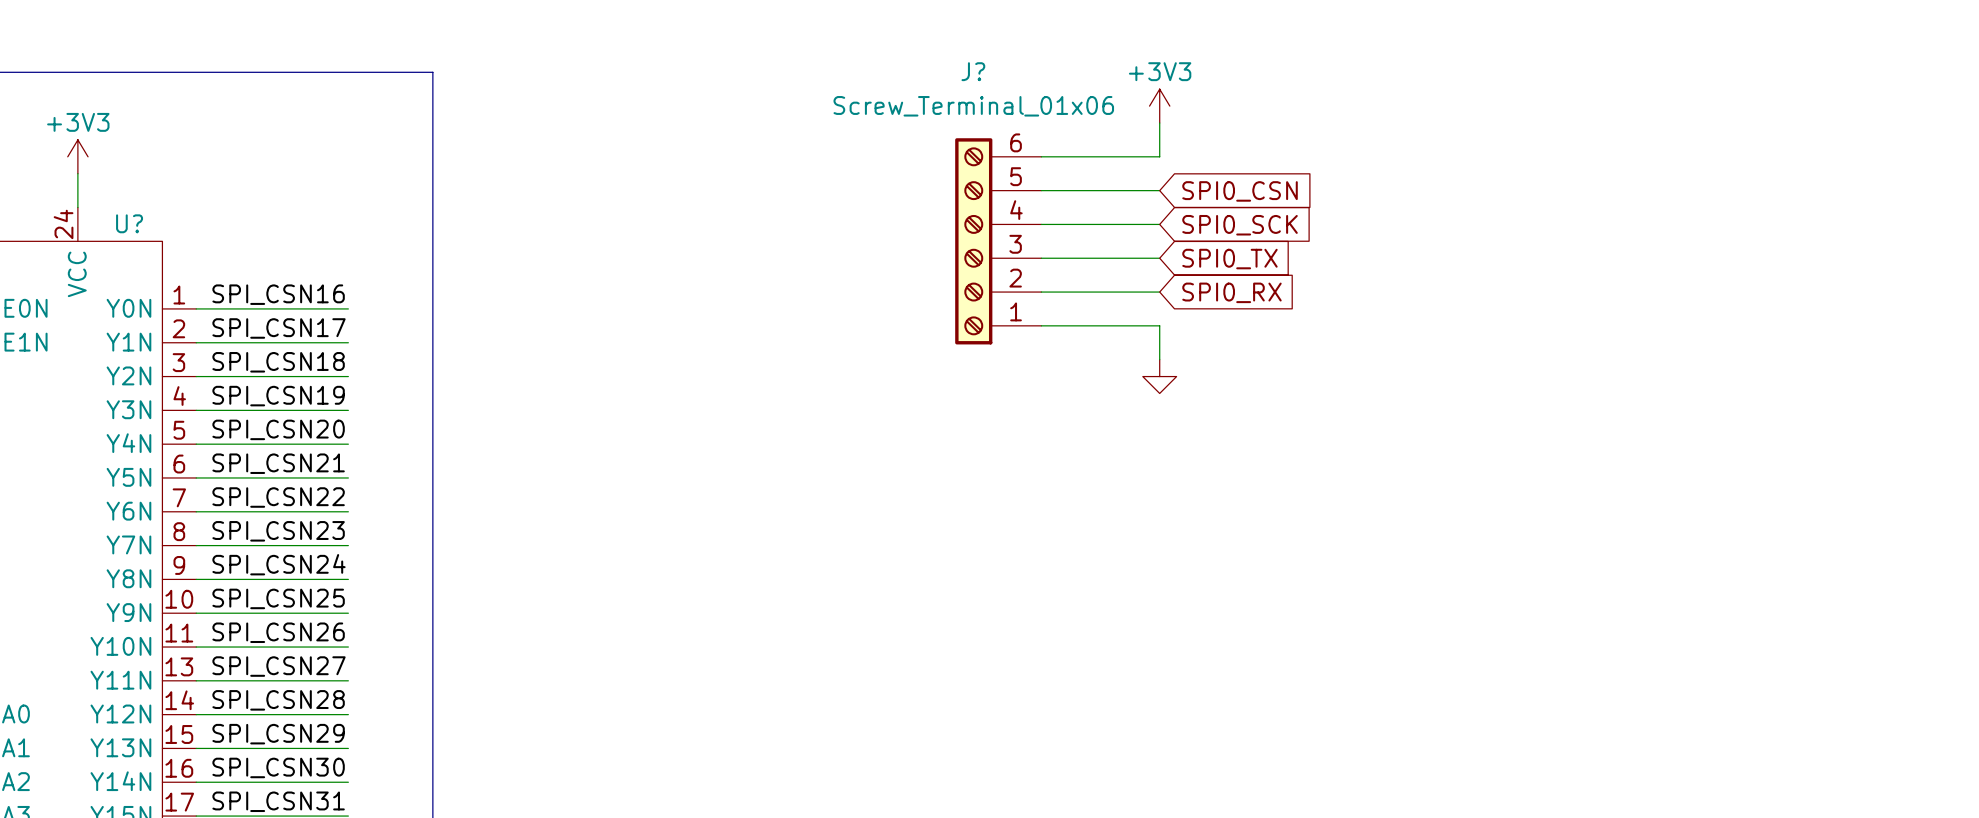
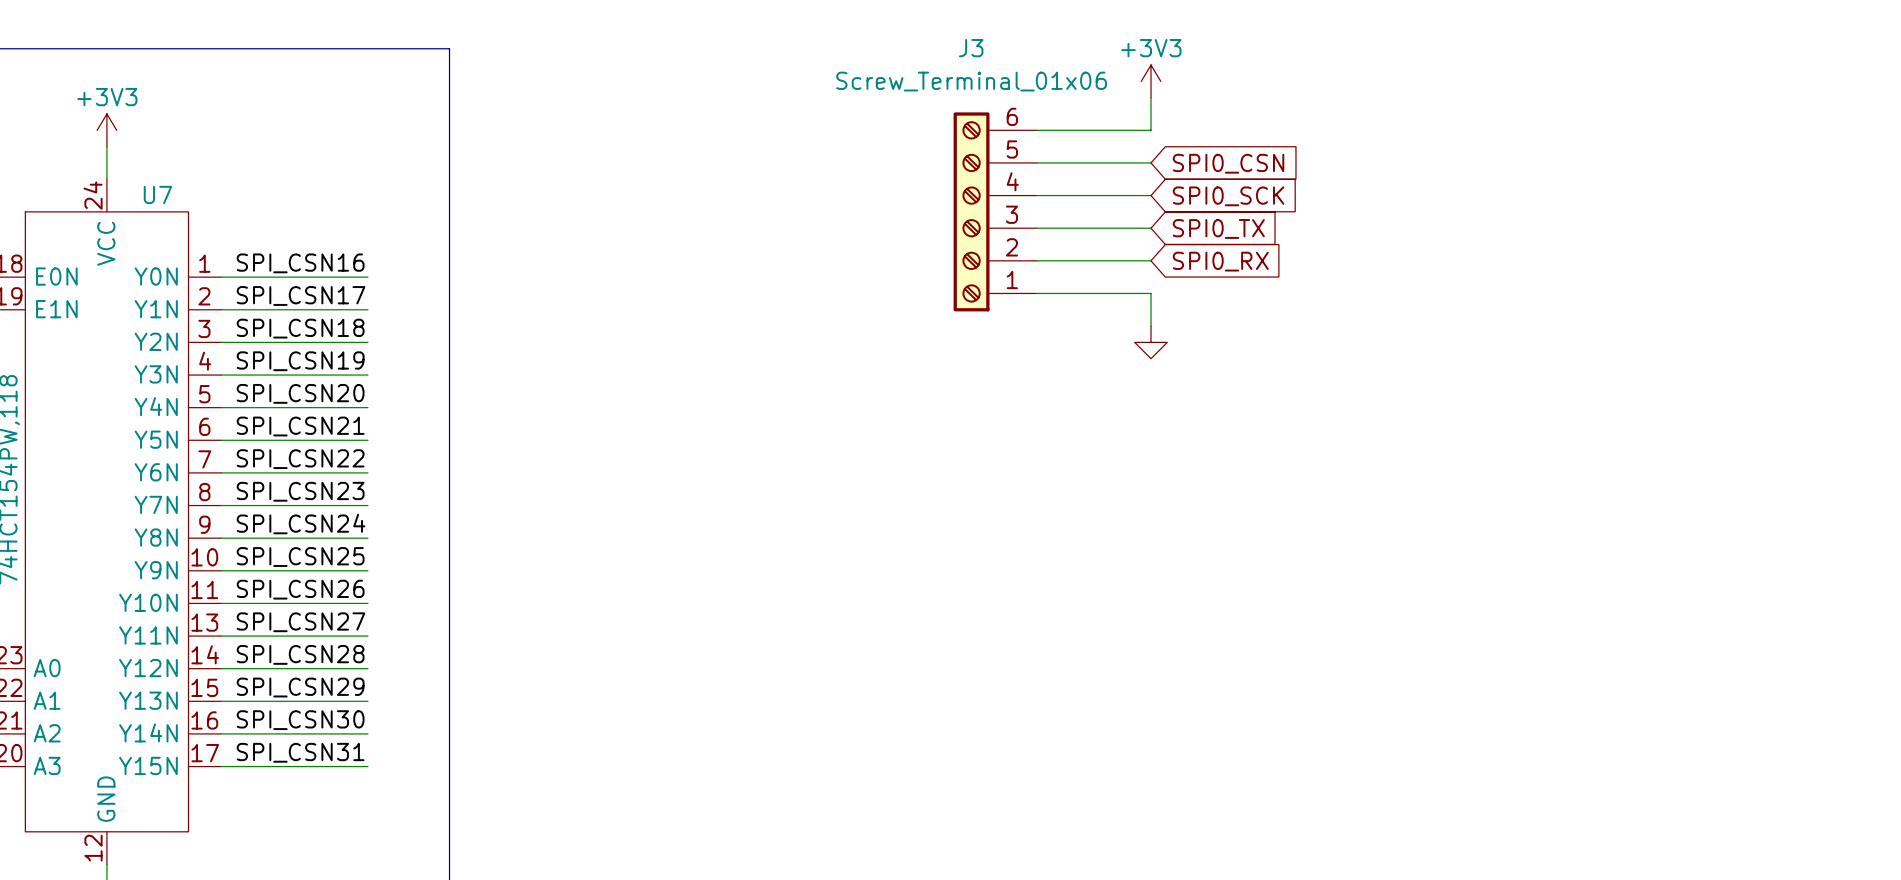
J? name: J? (973, 71) -> J3 (971, 48)
U? name: U? (129, 223) -> U7 (157, 194)

